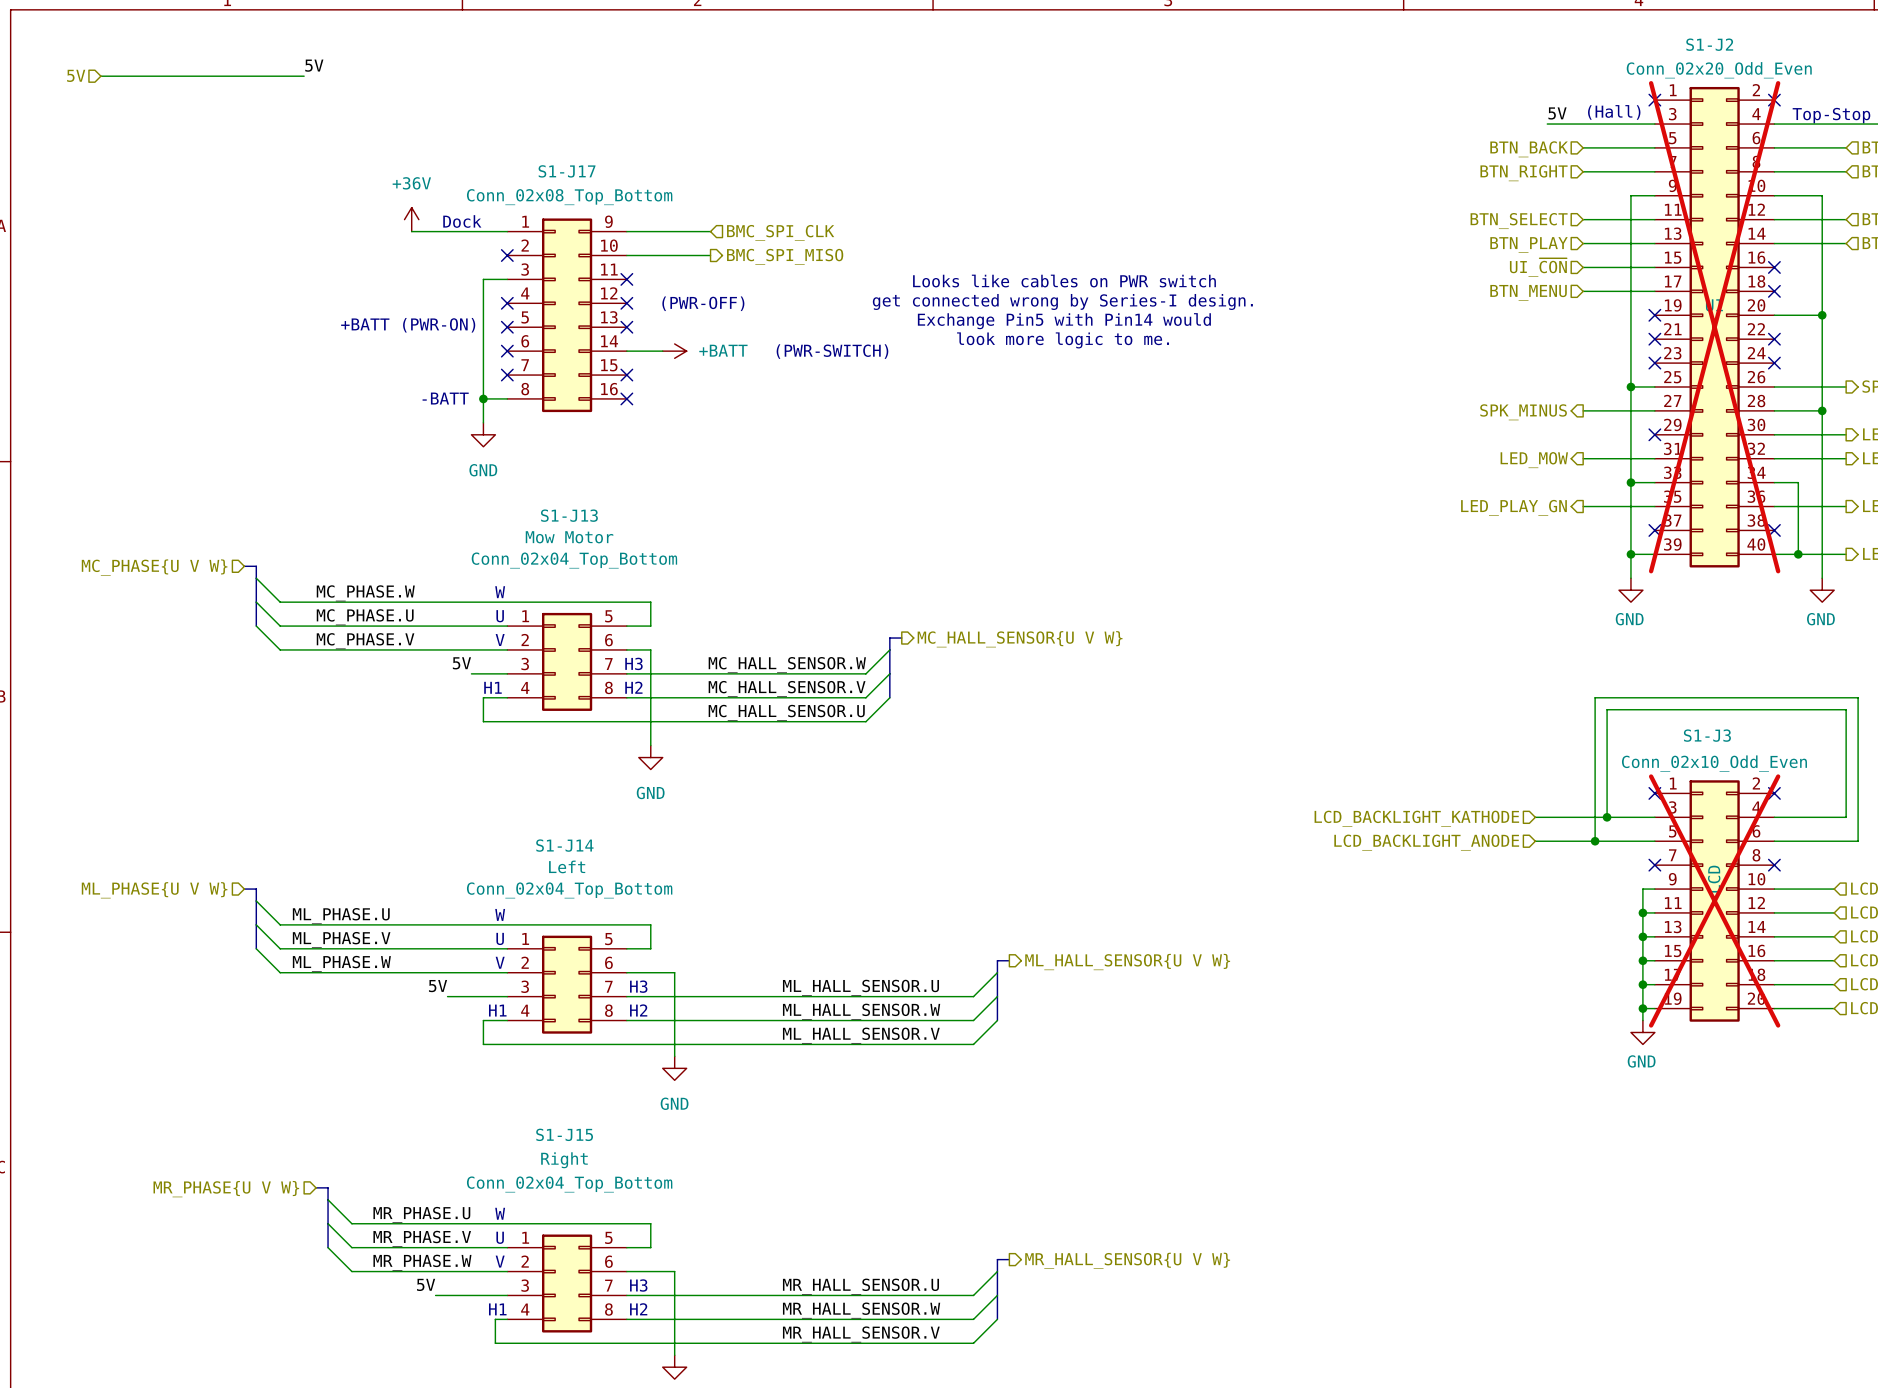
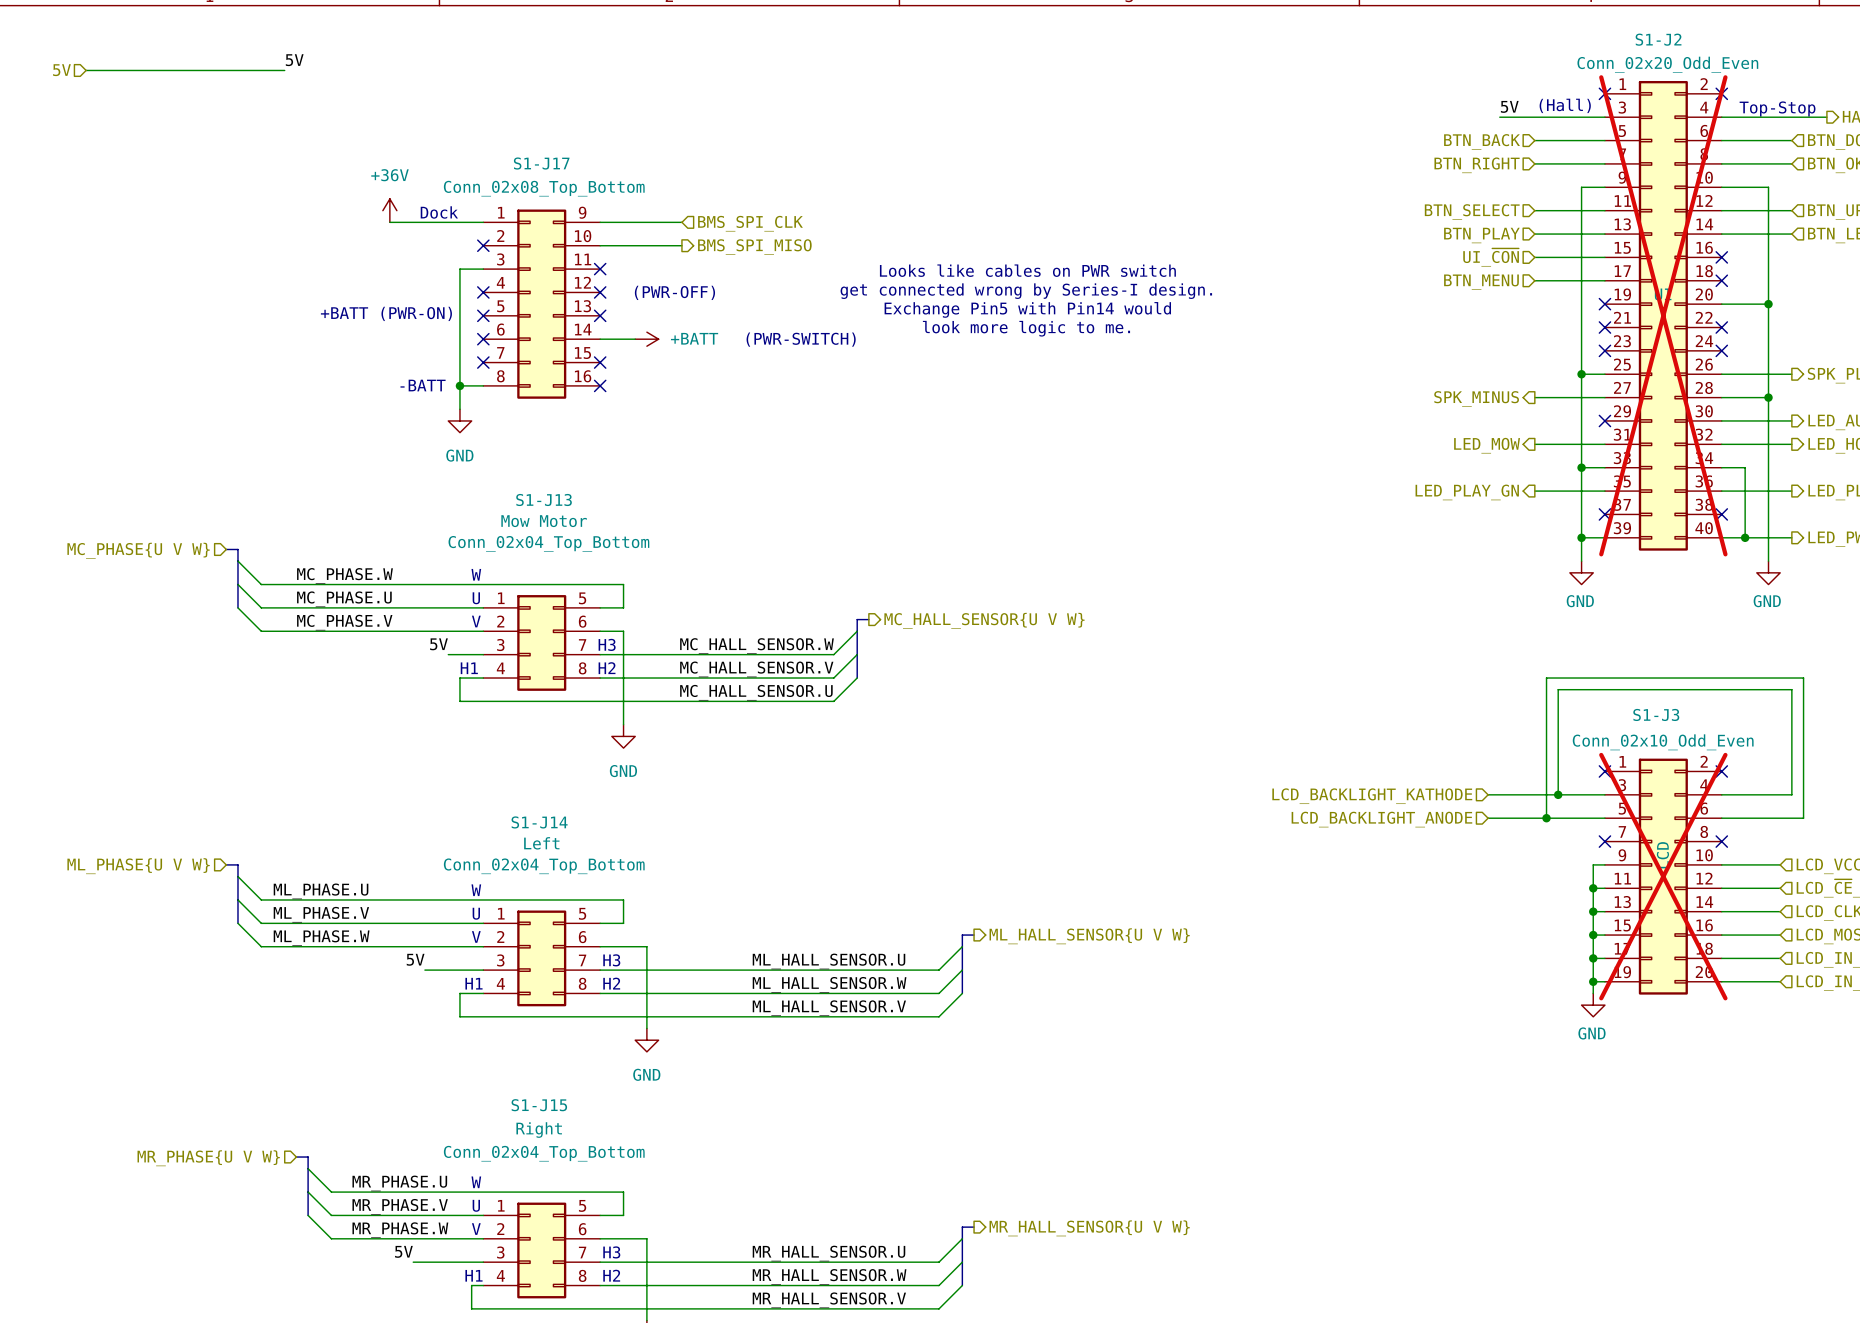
hierarchical label: BMC_SPI_CLK (780, 232) -> BMS_SPI_CLK (750, 223)
hierarchical label: BMC_SPI_MISO (785, 256) -> BMS_SPI_MISO (754, 247)

